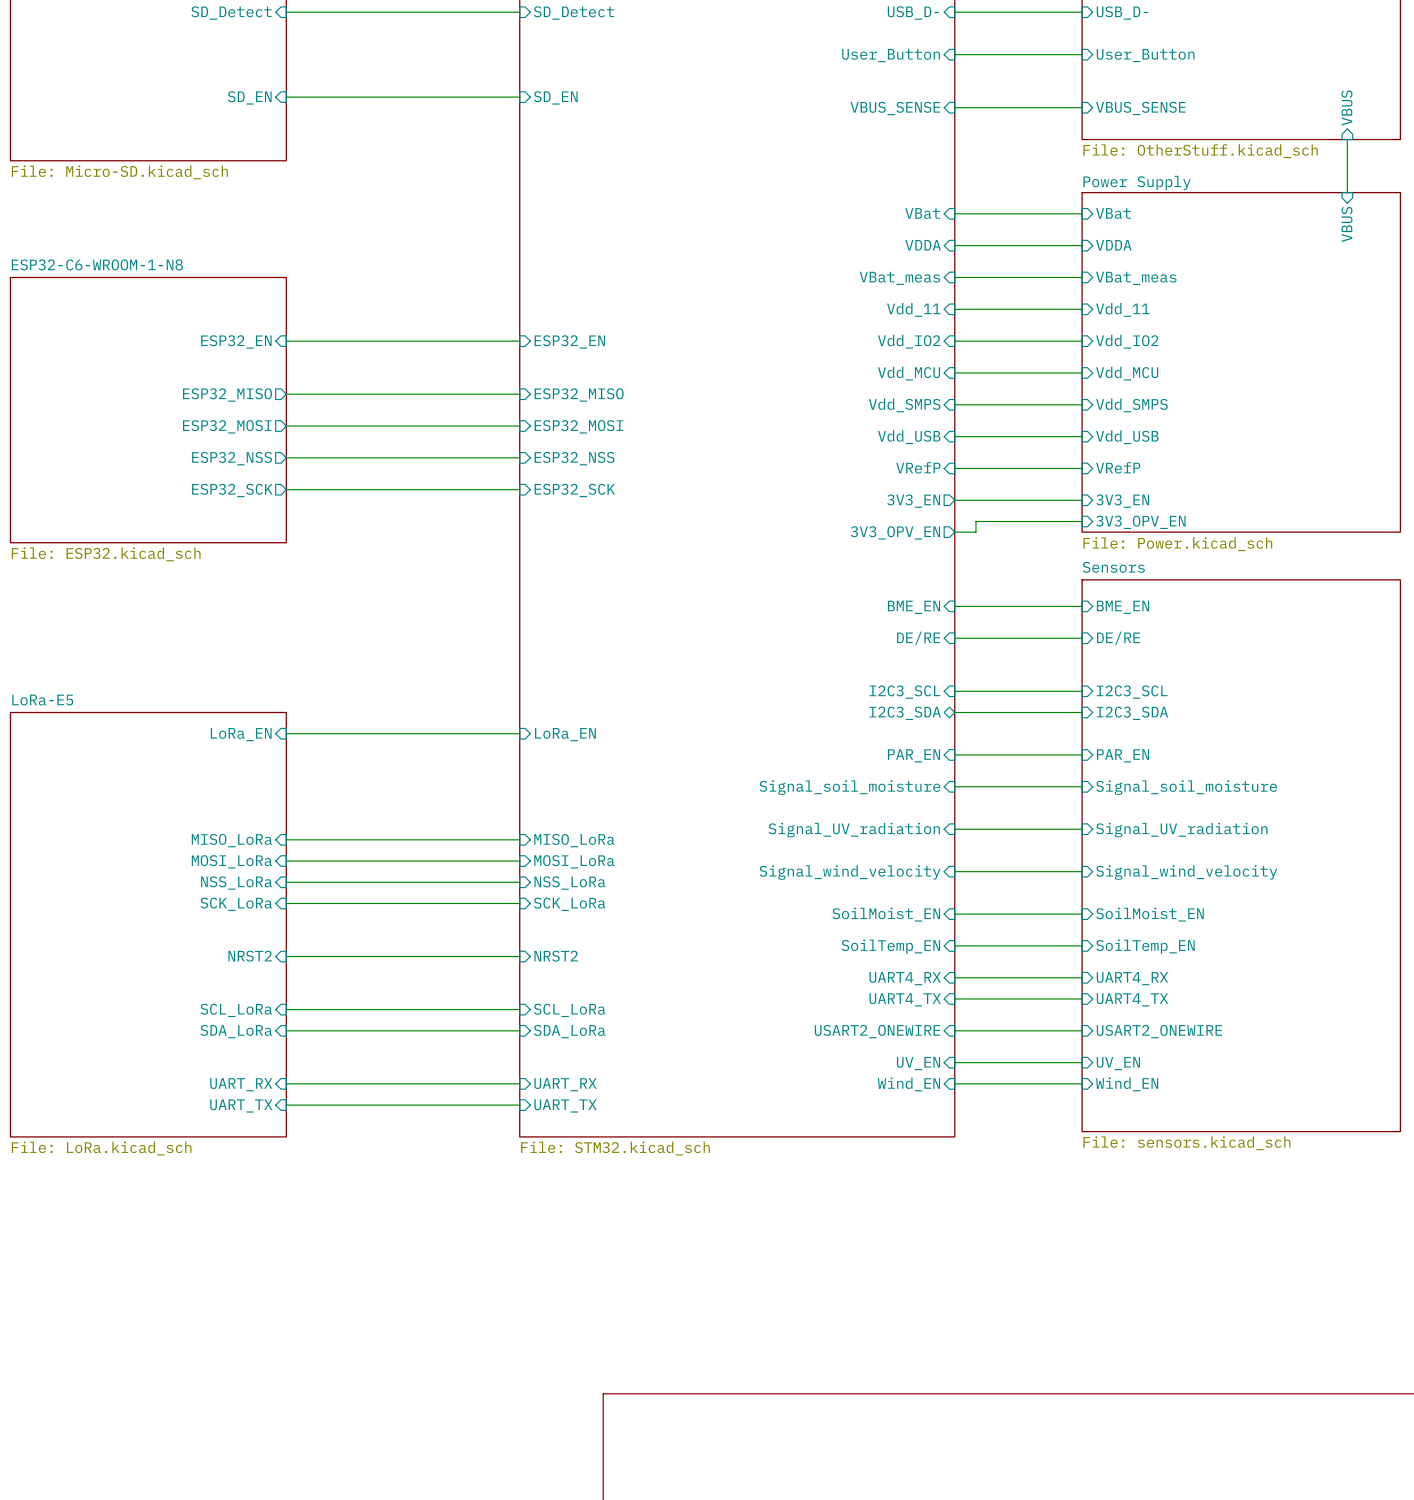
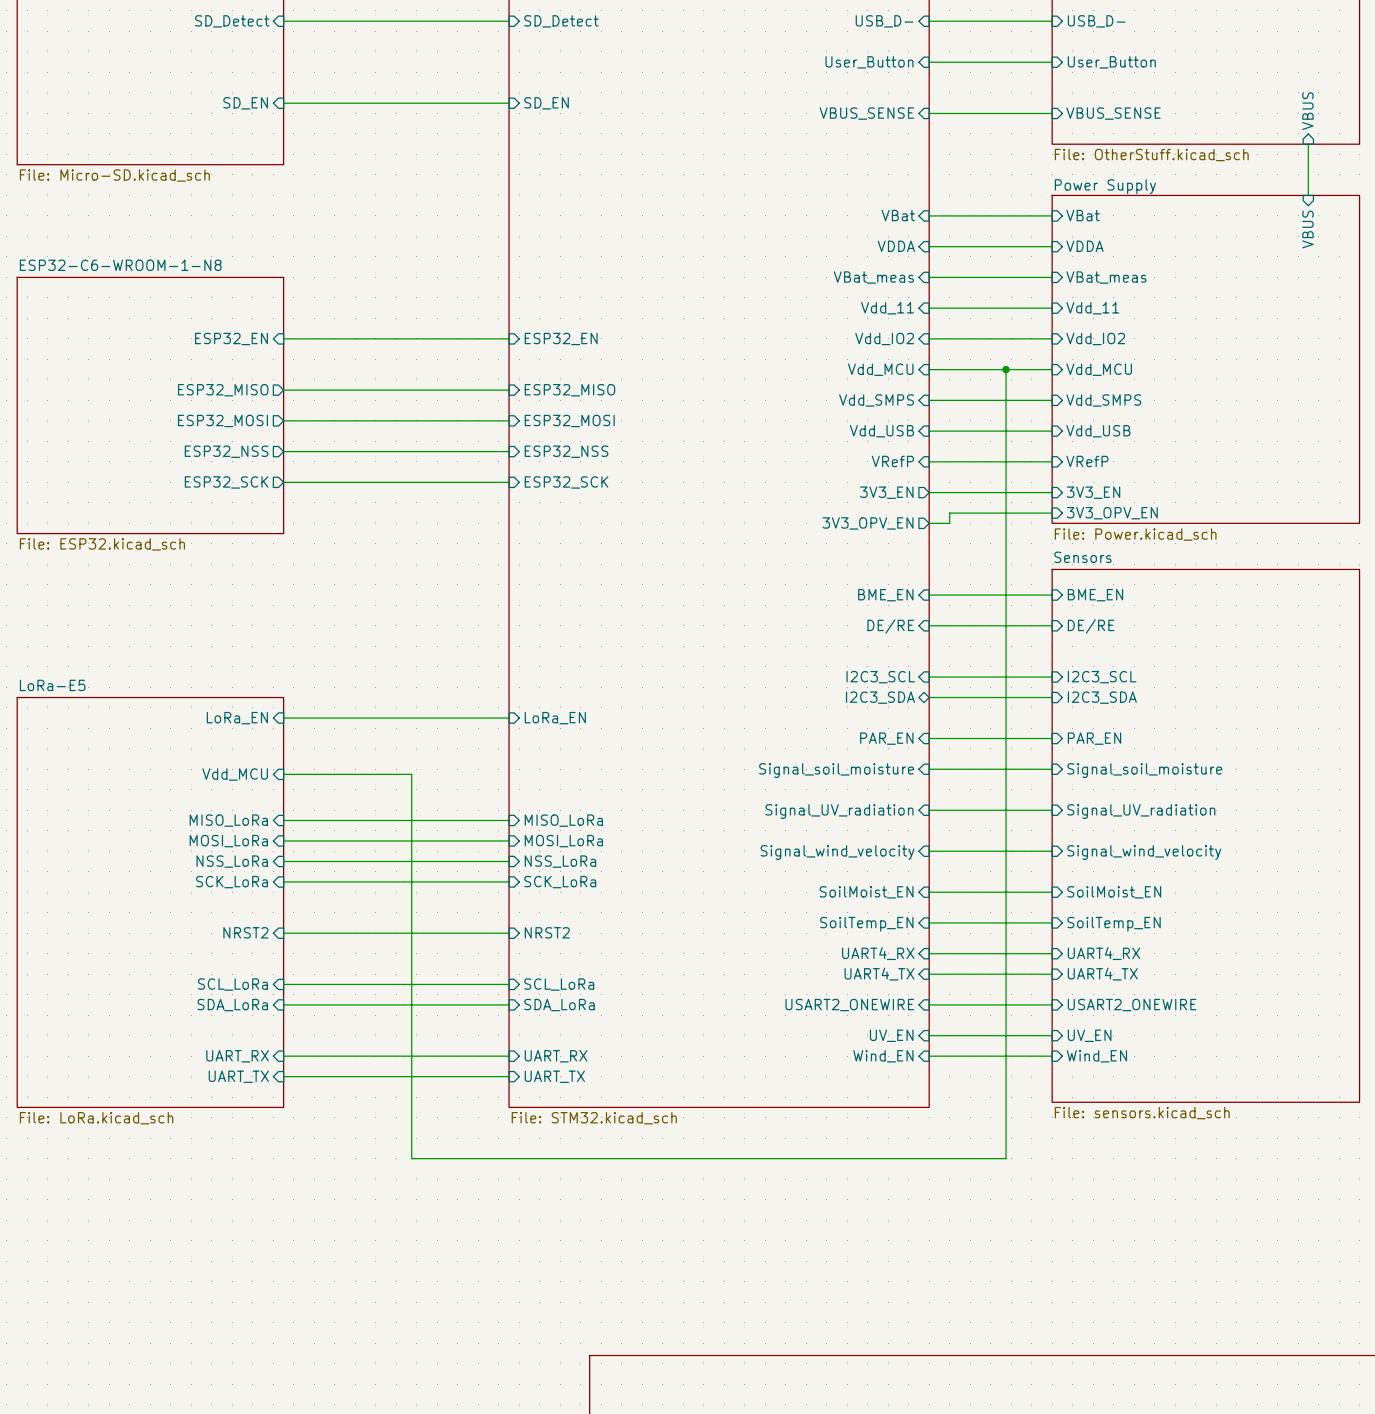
wire: none -> (1006, 369) (1006, 1158) (411, 1158) (411, 774) (283, 774)
junction: none -> (1006, 369)
sheet pin: none -> Vdd_MCU (235, 774)

